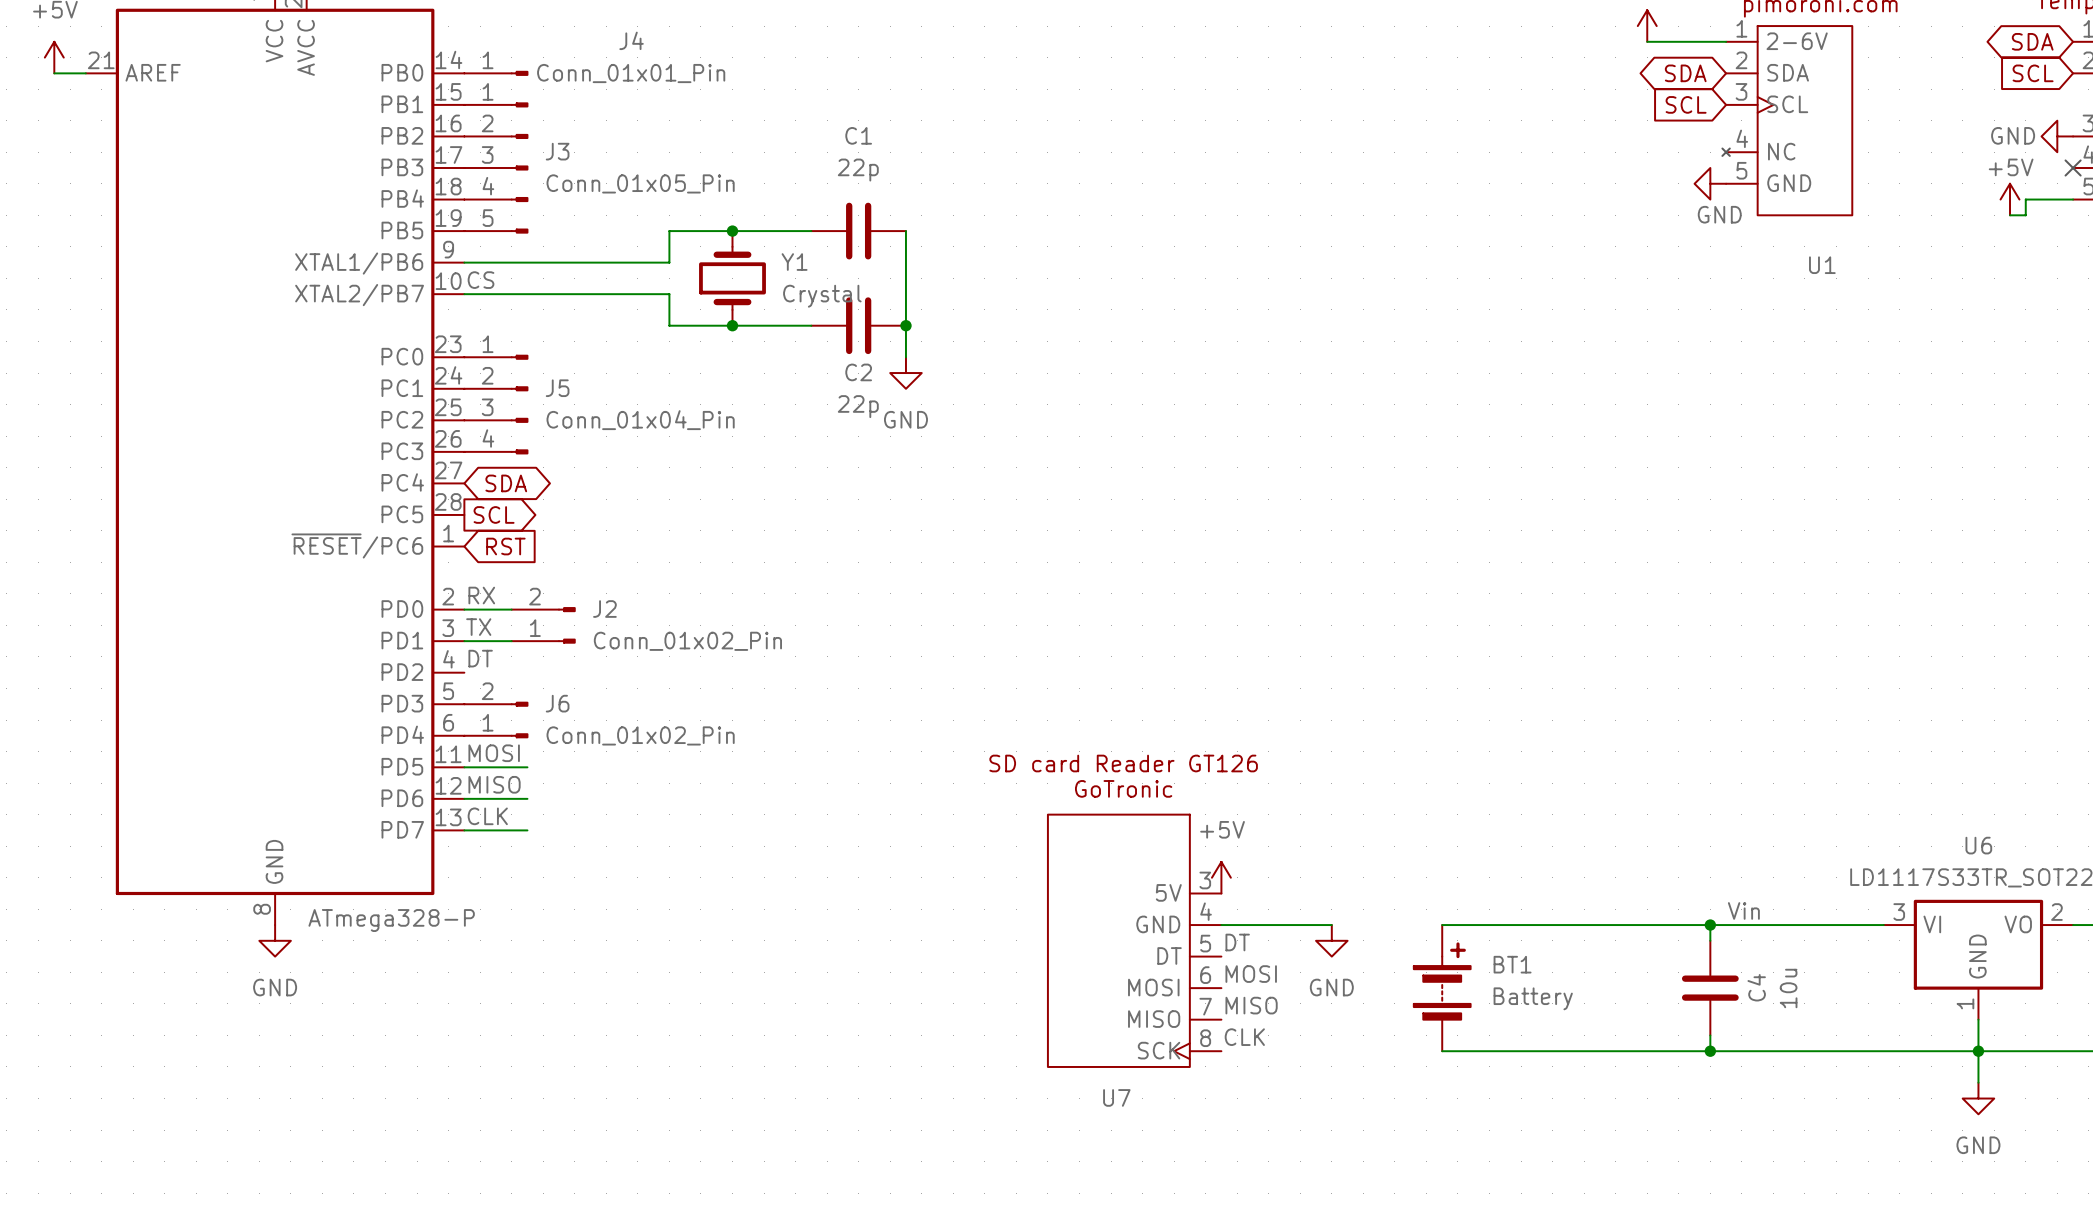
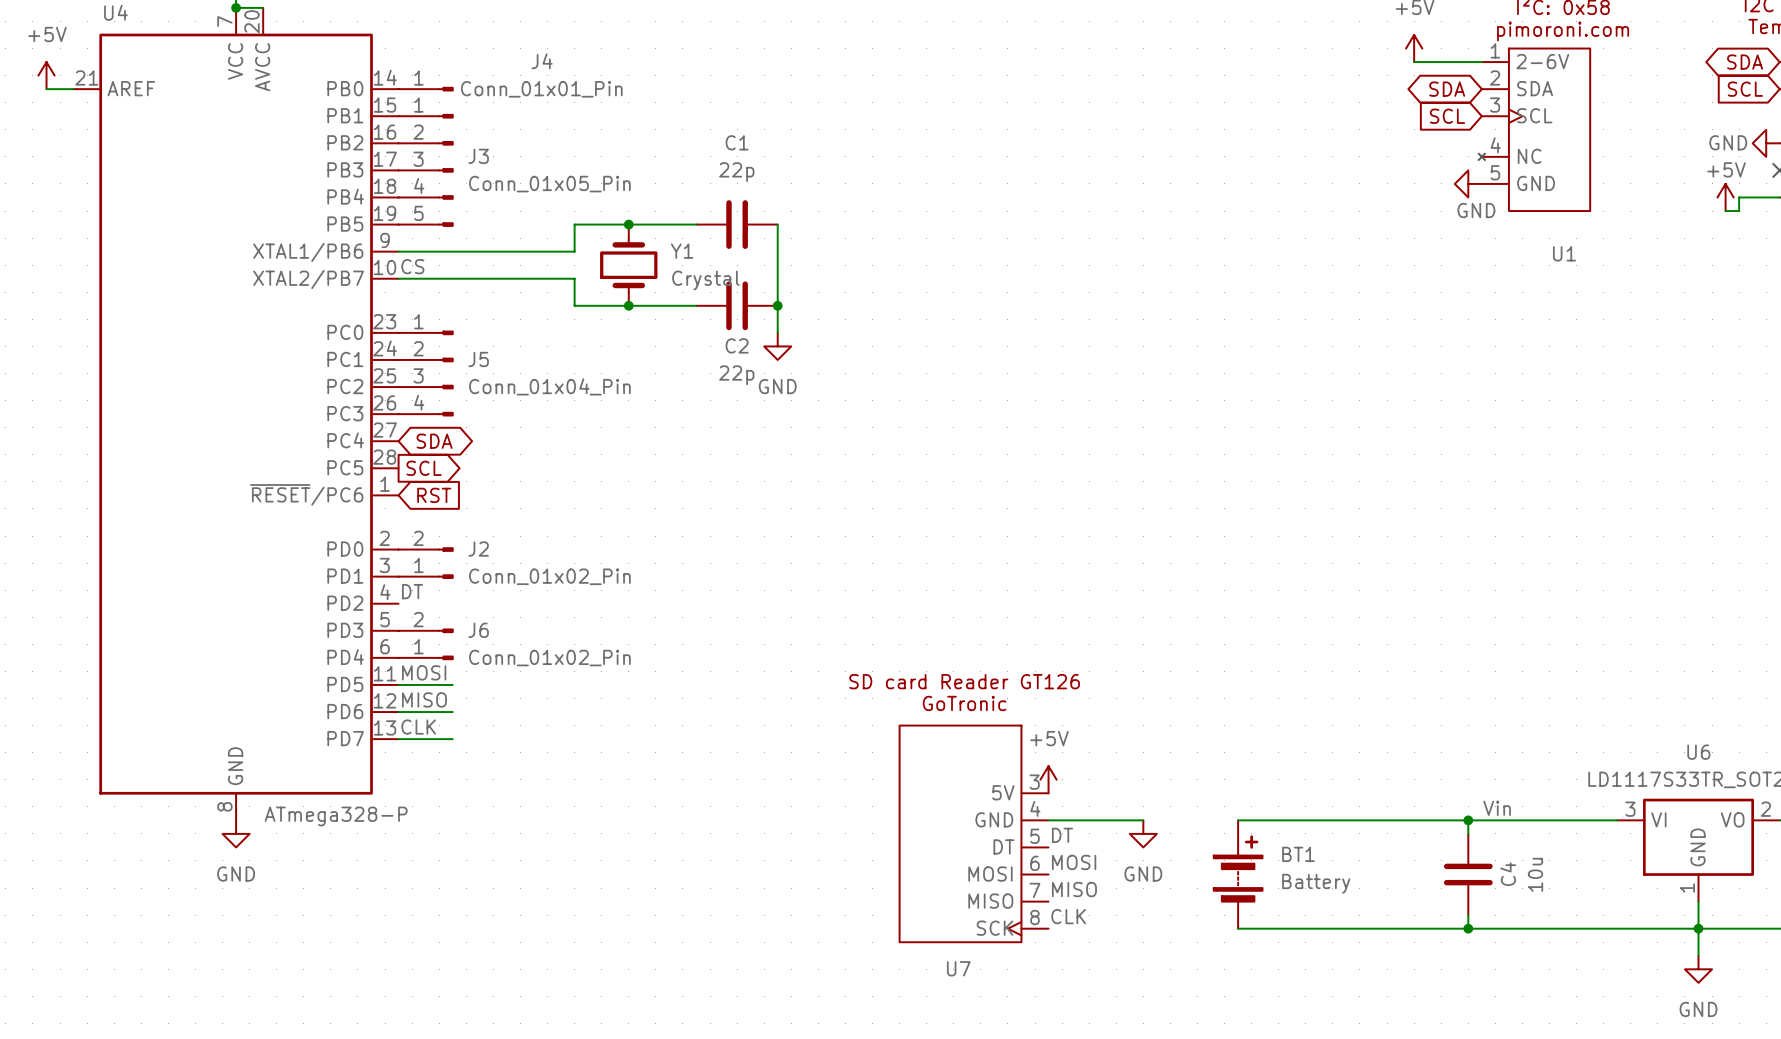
label: RX (481, 595) -> none
J2 position: (543, 625) -> (426, 563)
label: TX (478, 627) -> none

